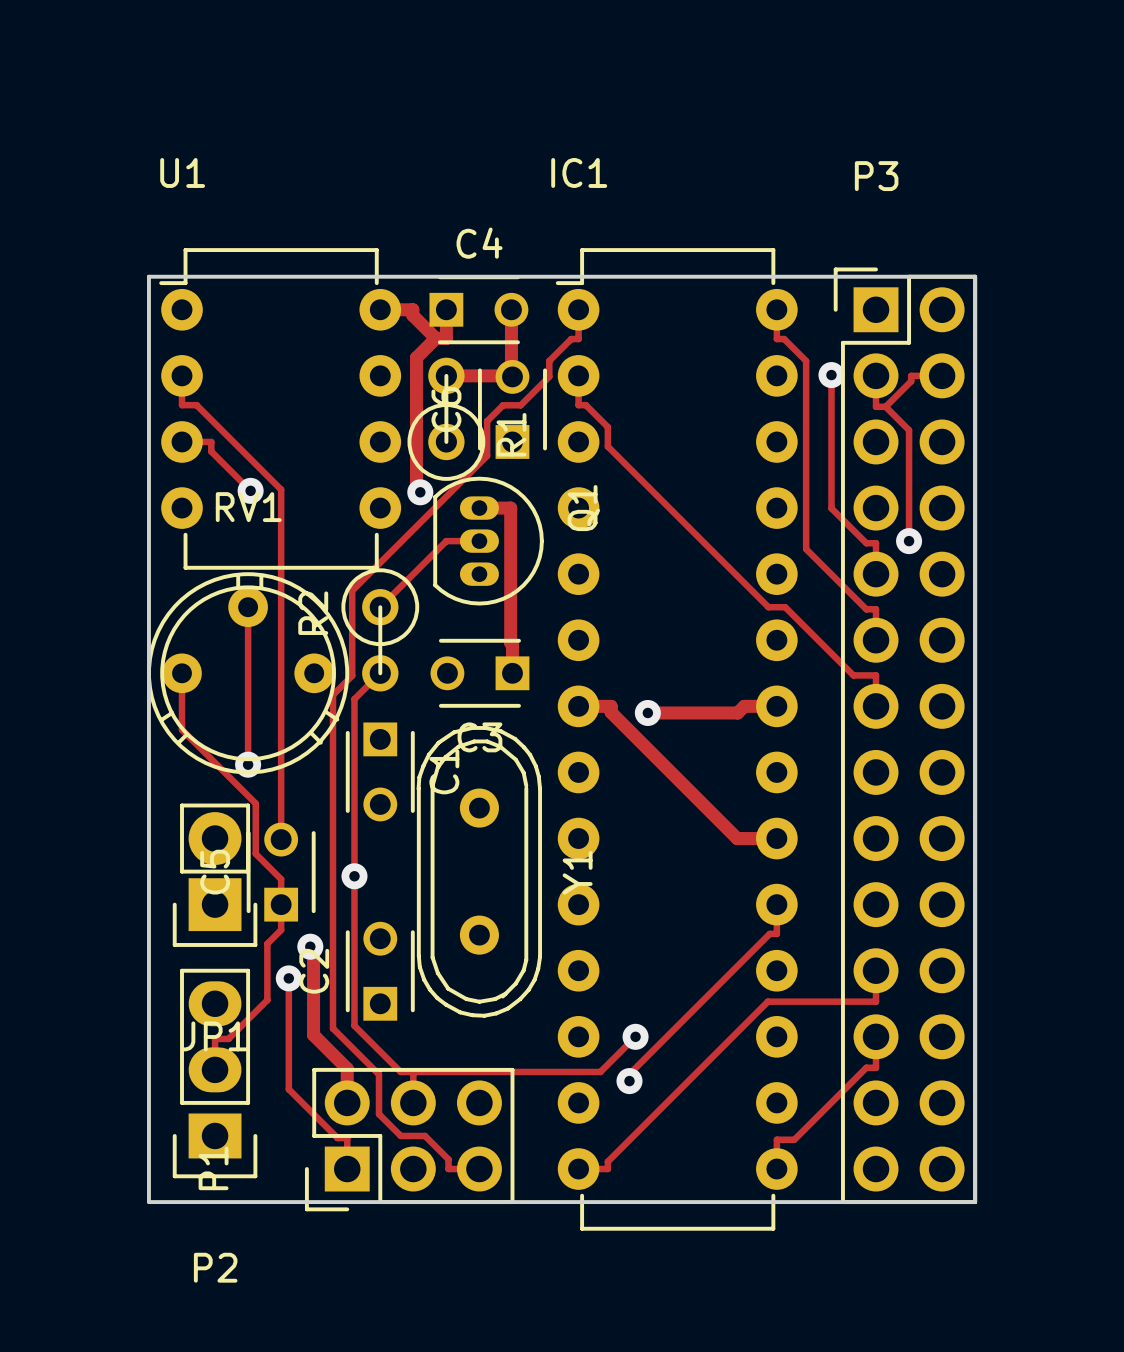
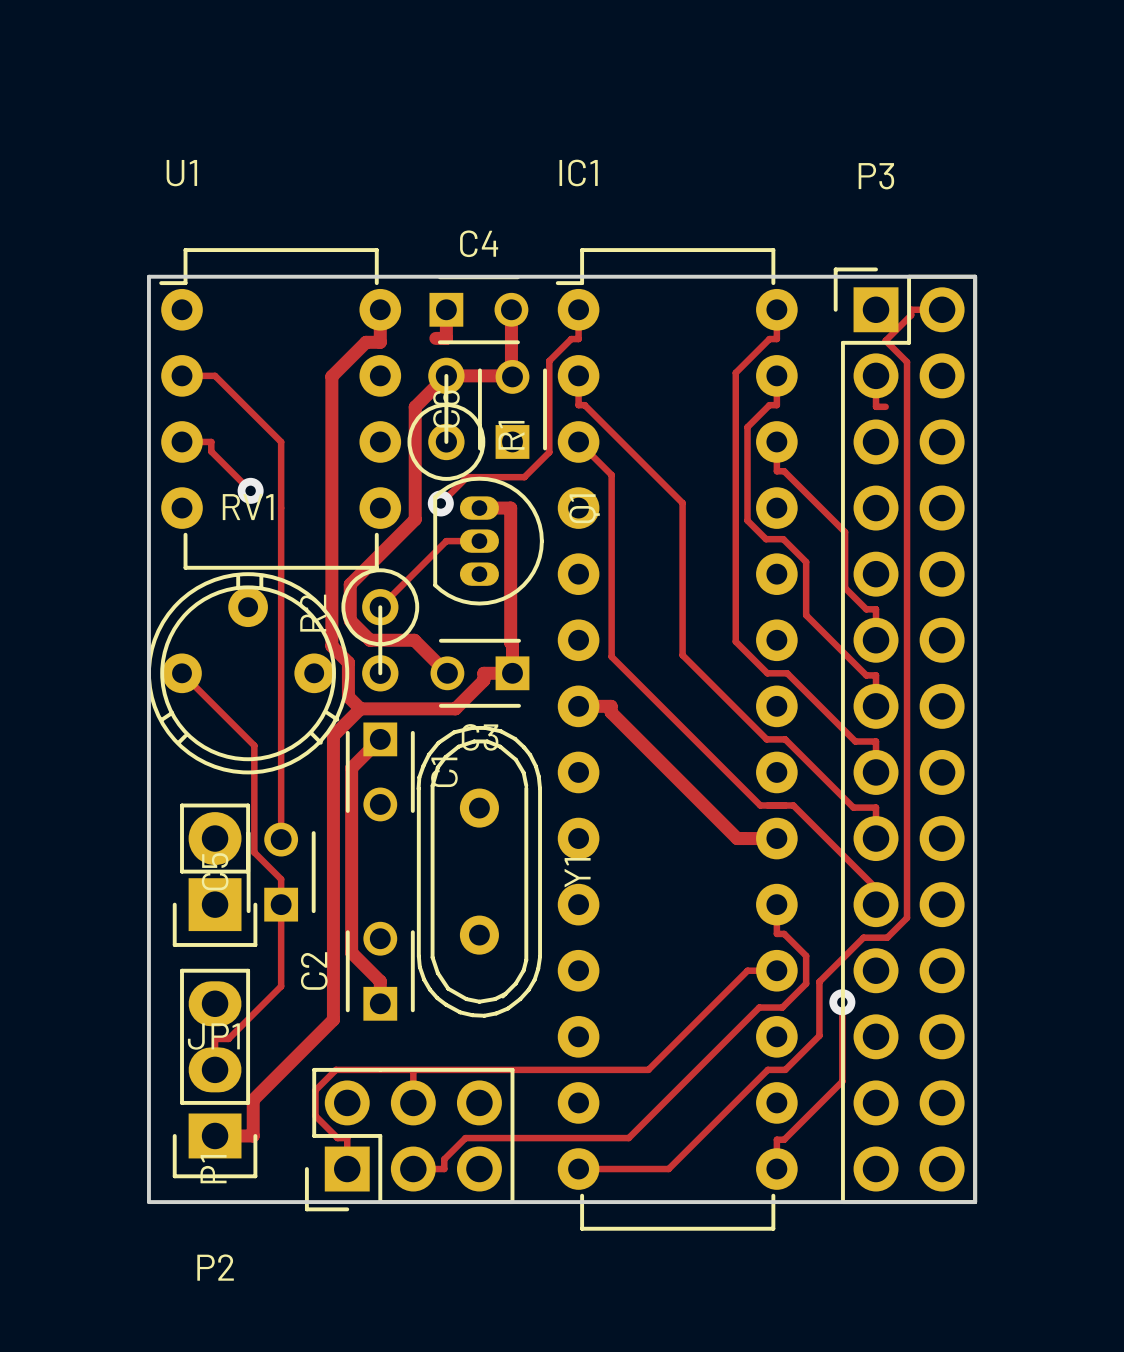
track: (380, 309) (412, 309) (412, 315) (435, 338) (416, 357) (416, 488) (420, 492) -> (380, 309) (380, 342) (366, 342) (331, 376) (331, 646) (348, 662) (348, 696) (360, 708)
track: (776, 339) (784, 339) (806, 361) (806, 549) (845, 588) -> (776, 441) (776, 471) (784, 471) (845, 532) (845, 588)
track: none -> (776, 339) (769, 339) (735, 372) (735, 641) (767, 673) (787, 673) (855, 741) (876, 741) (876, 772)
track: (182, 375) (182, 405) (196, 405) (281, 489) -> (182, 375) (215, 375) (281, 441) (281, 489)
track: none -> (446, 375) (415, 407) (415, 519) (350, 584) (350, 620) (370, 640) (414, 640) (447, 673)
track: none -> (776, 375) (776, 405) (769, 405) (747, 427) (747, 520) (766, 539) (783, 539) (806, 562) (806, 615) (866, 675)
track: (831, 375) (831, 508) (866, 543) (876, 543) (876, 574) -> none
via: (831, 375) -> none
track: (942, 375) (911, 375) (911, 381) (885, 406) (909, 430) (909, 541) -> none
track: (549, 376) (520, 405) (503, 405) (487, 421) (487, 455) (352, 590) (352, 675) (333, 695) (333, 1028) (379, 1074) (379, 1114) (400, 1135) (425, 1135) (448, 1159) (448, 1169) (479, 1169) -> (549, 376) (549, 452) (524, 477) (467, 477) (440, 503)
track: (584, 405) (607, 427) (607, 446) (768, 607) (785, 607) (853, 675) (866, 675) -> (584, 405) (682, 503) (682, 655) (766, 739) (785, 739) (853, 807) (876, 807) (876, 838)
track: none -> (578, 441) (611, 475) (611, 656) (760, 805) (793, 805) (876, 888) (876, 904)
via position: (420, 492) -> (440, 503)
via: (909, 541) -> none
track: (248, 607) (248, 764) -> none
track: (182, 673) (182, 729) (255, 803) (255, 853) -> (182, 673) (254, 745) (255, 853)
track: (380, 673) (354, 699) (354, 1025) (400, 1071) (600, 1071) (635, 1036) -> none
track: none -> (512, 673) (483, 673) (483, 680) (455, 708) (360, 708)
track: (776, 706) (744, 706) (737, 712) (647, 712) -> none
track: none -> (360, 708) (333, 735) (333, 1019) (253, 1100) (253, 1135) (215, 1135)
via: (647, 712) -> none
track: none -> (380, 739) (351, 768) (351, 952) (380, 981) (380, 1003)
via: (248, 764) -> none
via: (354, 876) -> none
track: (281, 930) (267, 943) (267, 1000) -> (281, 930) (281, 986) (267, 1000)
track: (776, 933) (769, 933) (629, 1074) (629, 1081) -> (776, 933) (784, 933) (806, 955) (806, 983) (782, 1007) (759, 1007) (628, 1138) (465, 1138) (444, 1159) (444, 1169) (413, 1169)
track: (310, 946) (313, 949) (313, 1035) (347, 1068) (347, 1102) -> none
via: (310, 946) -> none
track: (876, 970) (876, 1001) (767, 1001) (607, 1161) (607, 1169) -> (942, 309) (911, 309) (911, 315) (885, 340) (907, 362) (907, 917) (887, 937) (863, 937) (819, 981) (819, 1035) (785, 1069) (767, 1069) (668, 1169) (607, 1169)
track: (288, 978) (288, 1089) (315, 1115) -> (776, 970) (747, 970) (648, 1069) (335, 1069) (315, 1090) (315, 1115)
via: (288, 978) -> none
via: none -> (842, 1002)
via: (635, 1036) -> none
track: (876, 1036) (876, 1067) (866, 1067) (794, 1139) (784, 1139) -> (842, 1002) (842, 1081) (784, 1139)
via: (629, 1081) -> none

